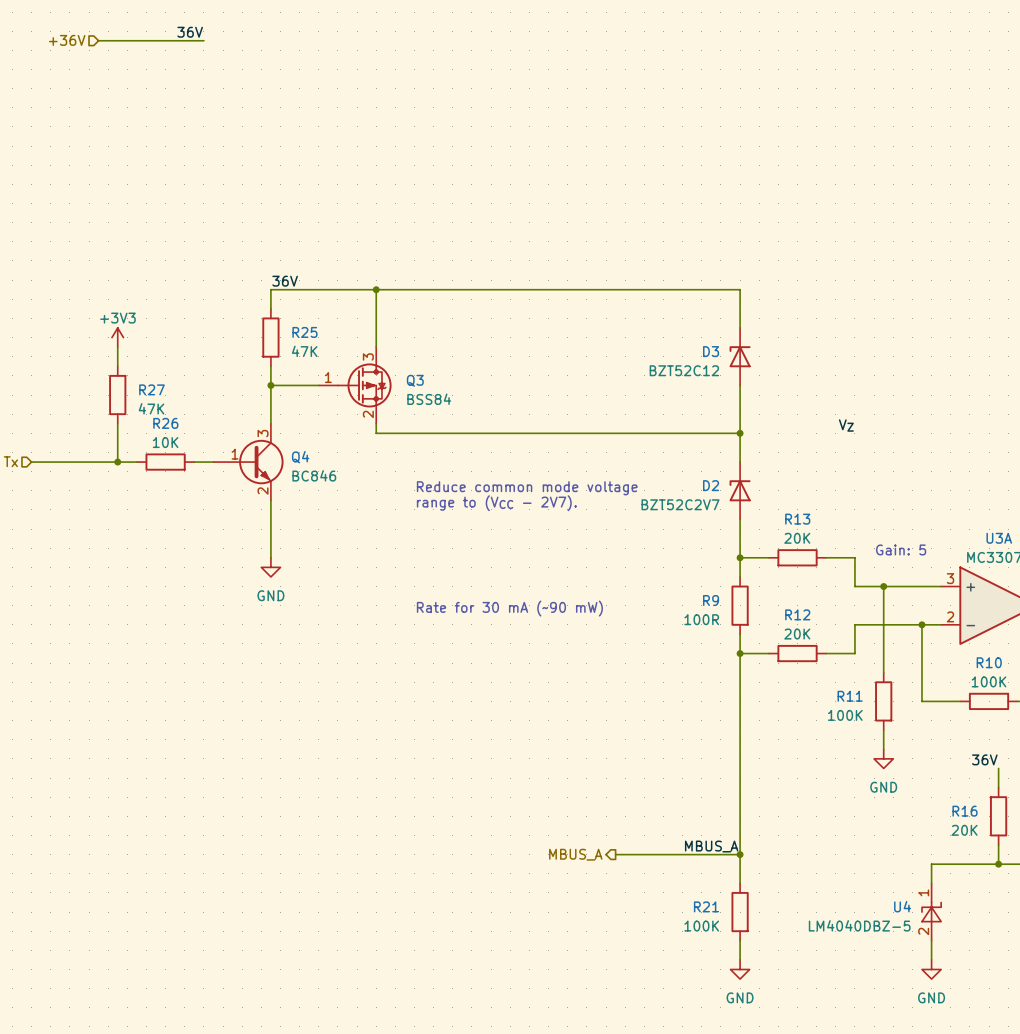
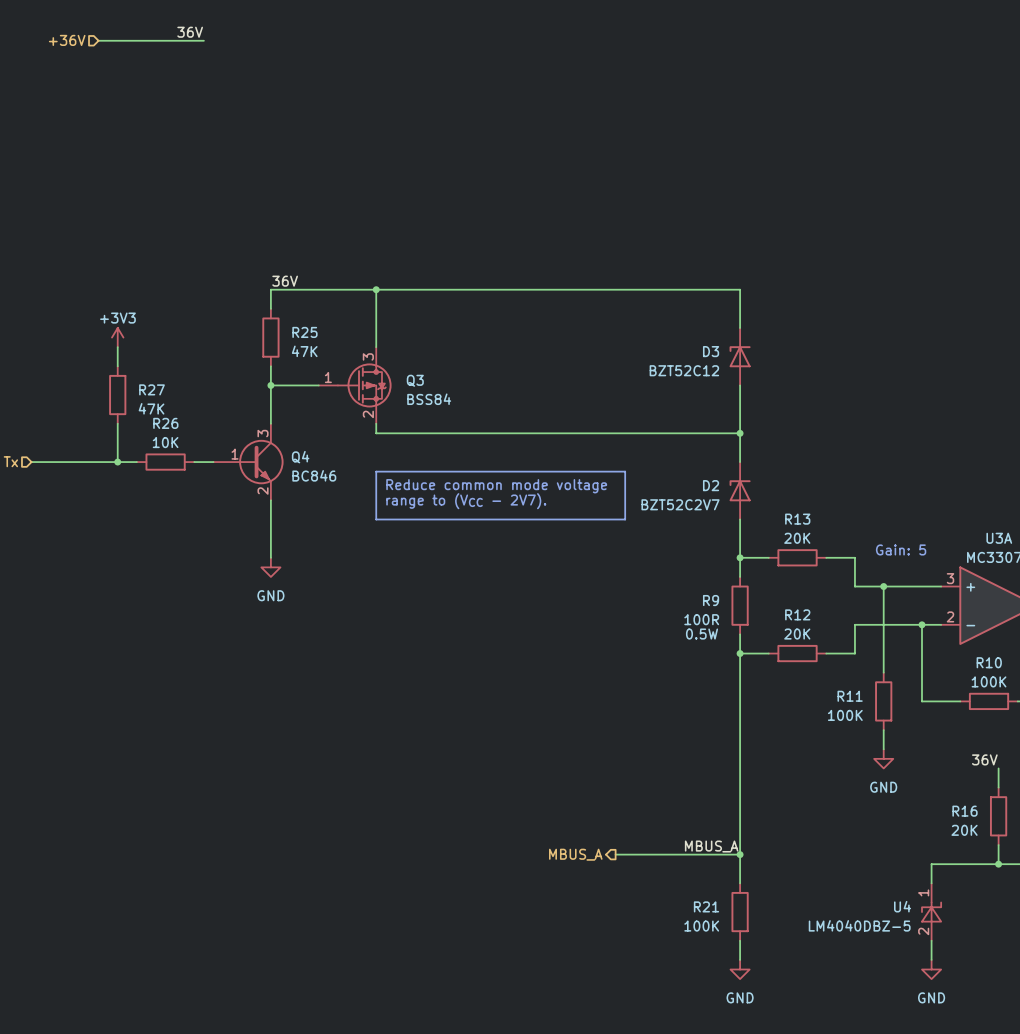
label: VZ (846, 425) -> none
line: none -> (376, 471) (625, 471) (625, 519) (376, 519) (376, 471)
text position: Reduce common mode voltage (527, 488) -> Reduce common mode voltage (496, 486)
text position: range to (VCC - 2V7). (496, 503) -> range to (VCC - 2V7). (466, 501)
text: Rate for 30 mA (~90 mW) (509, 608) -> none
R9 text: none -> 0.5W (702, 634)

